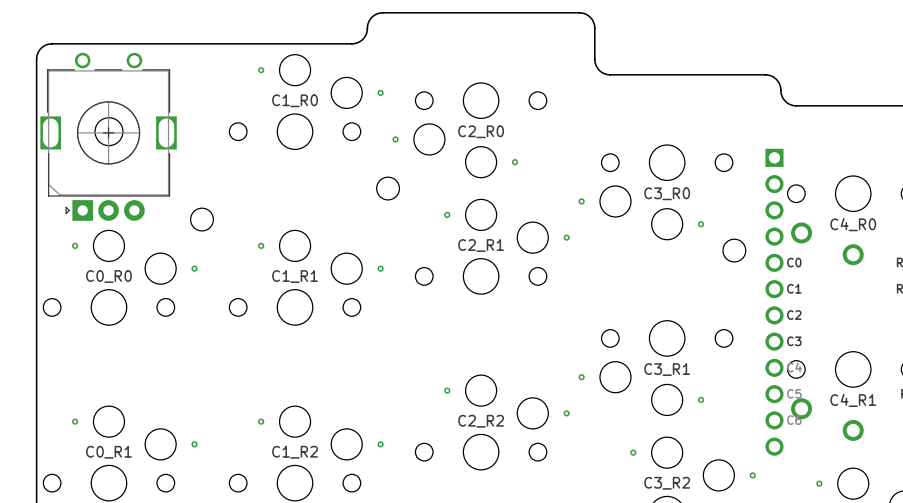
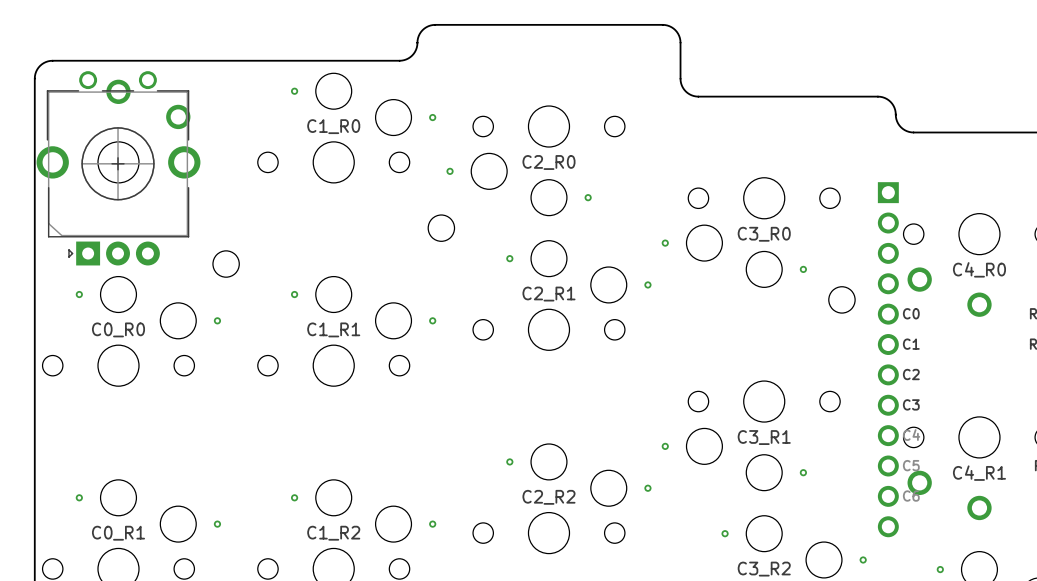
part footprint: [40, 52, 177, 221] -> [36, 71, 201, 266]

